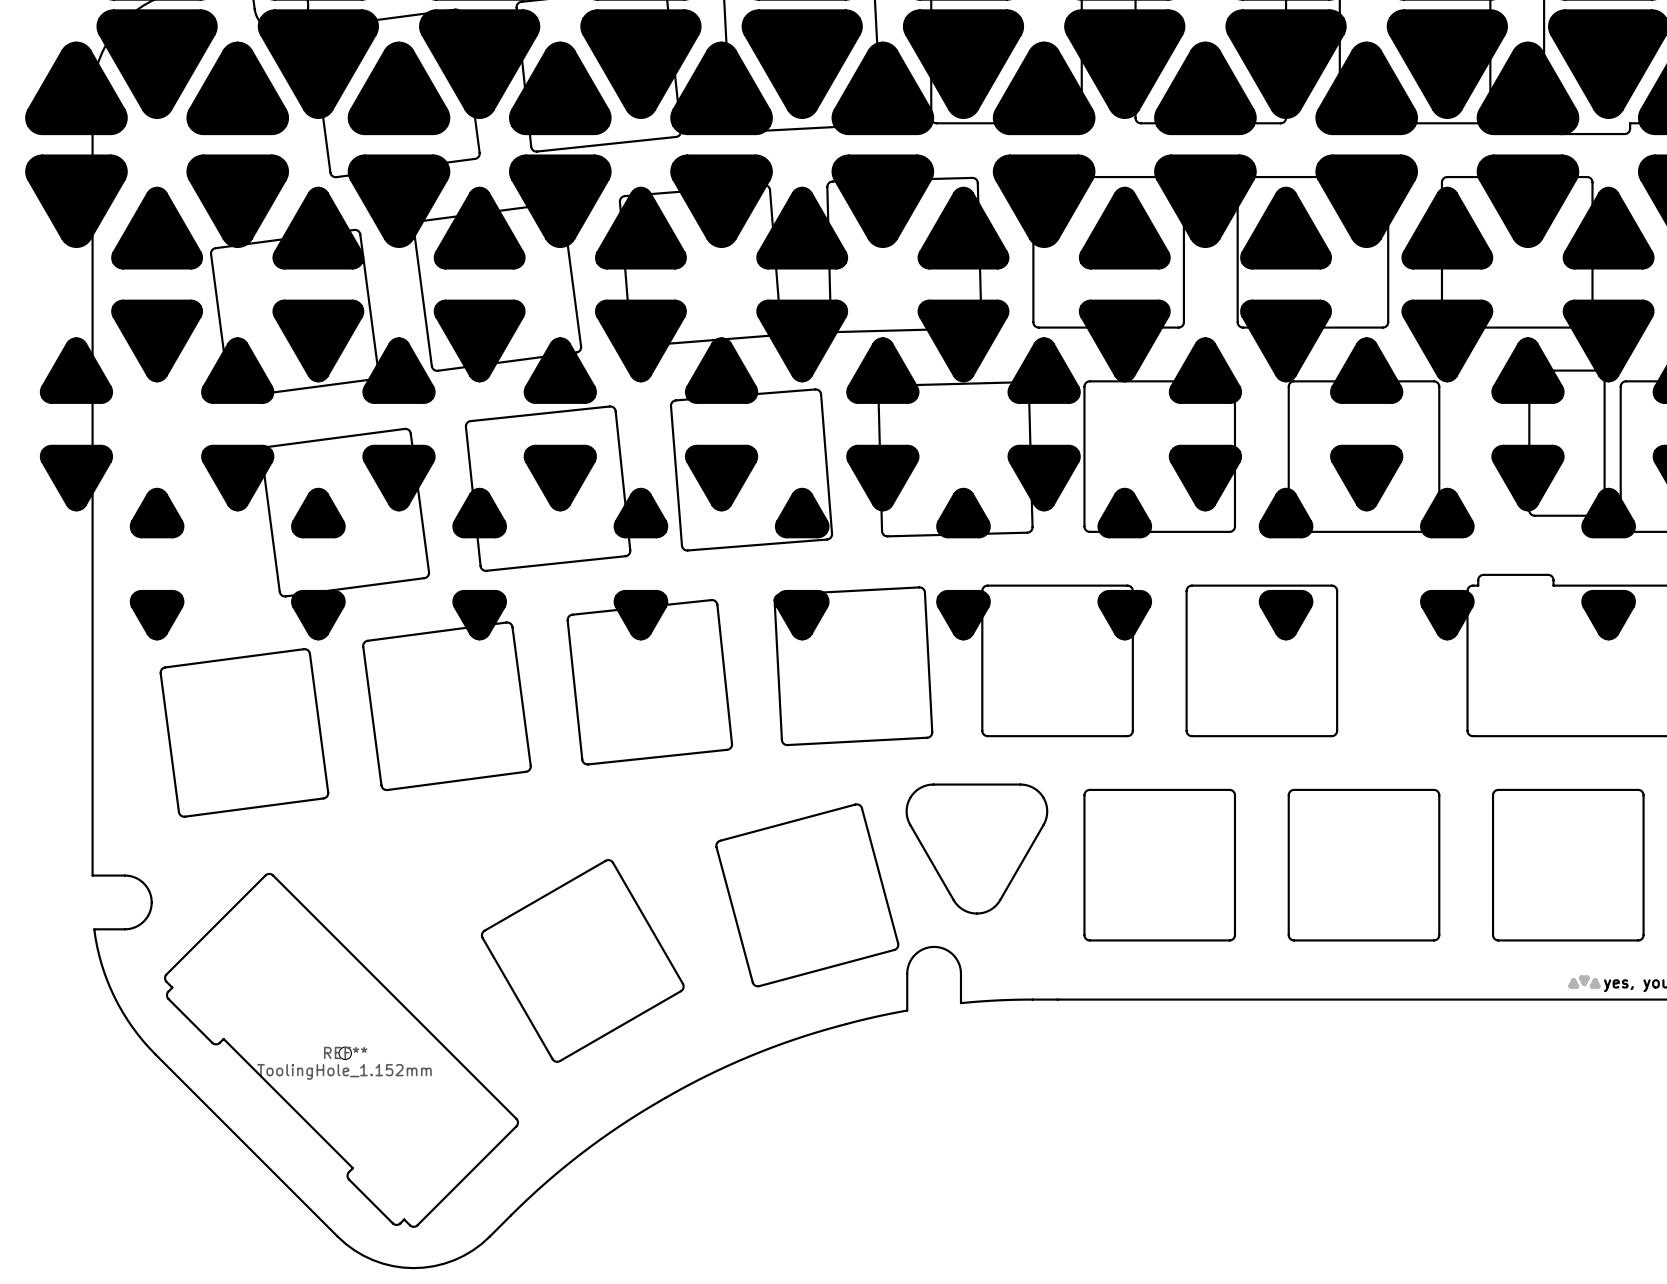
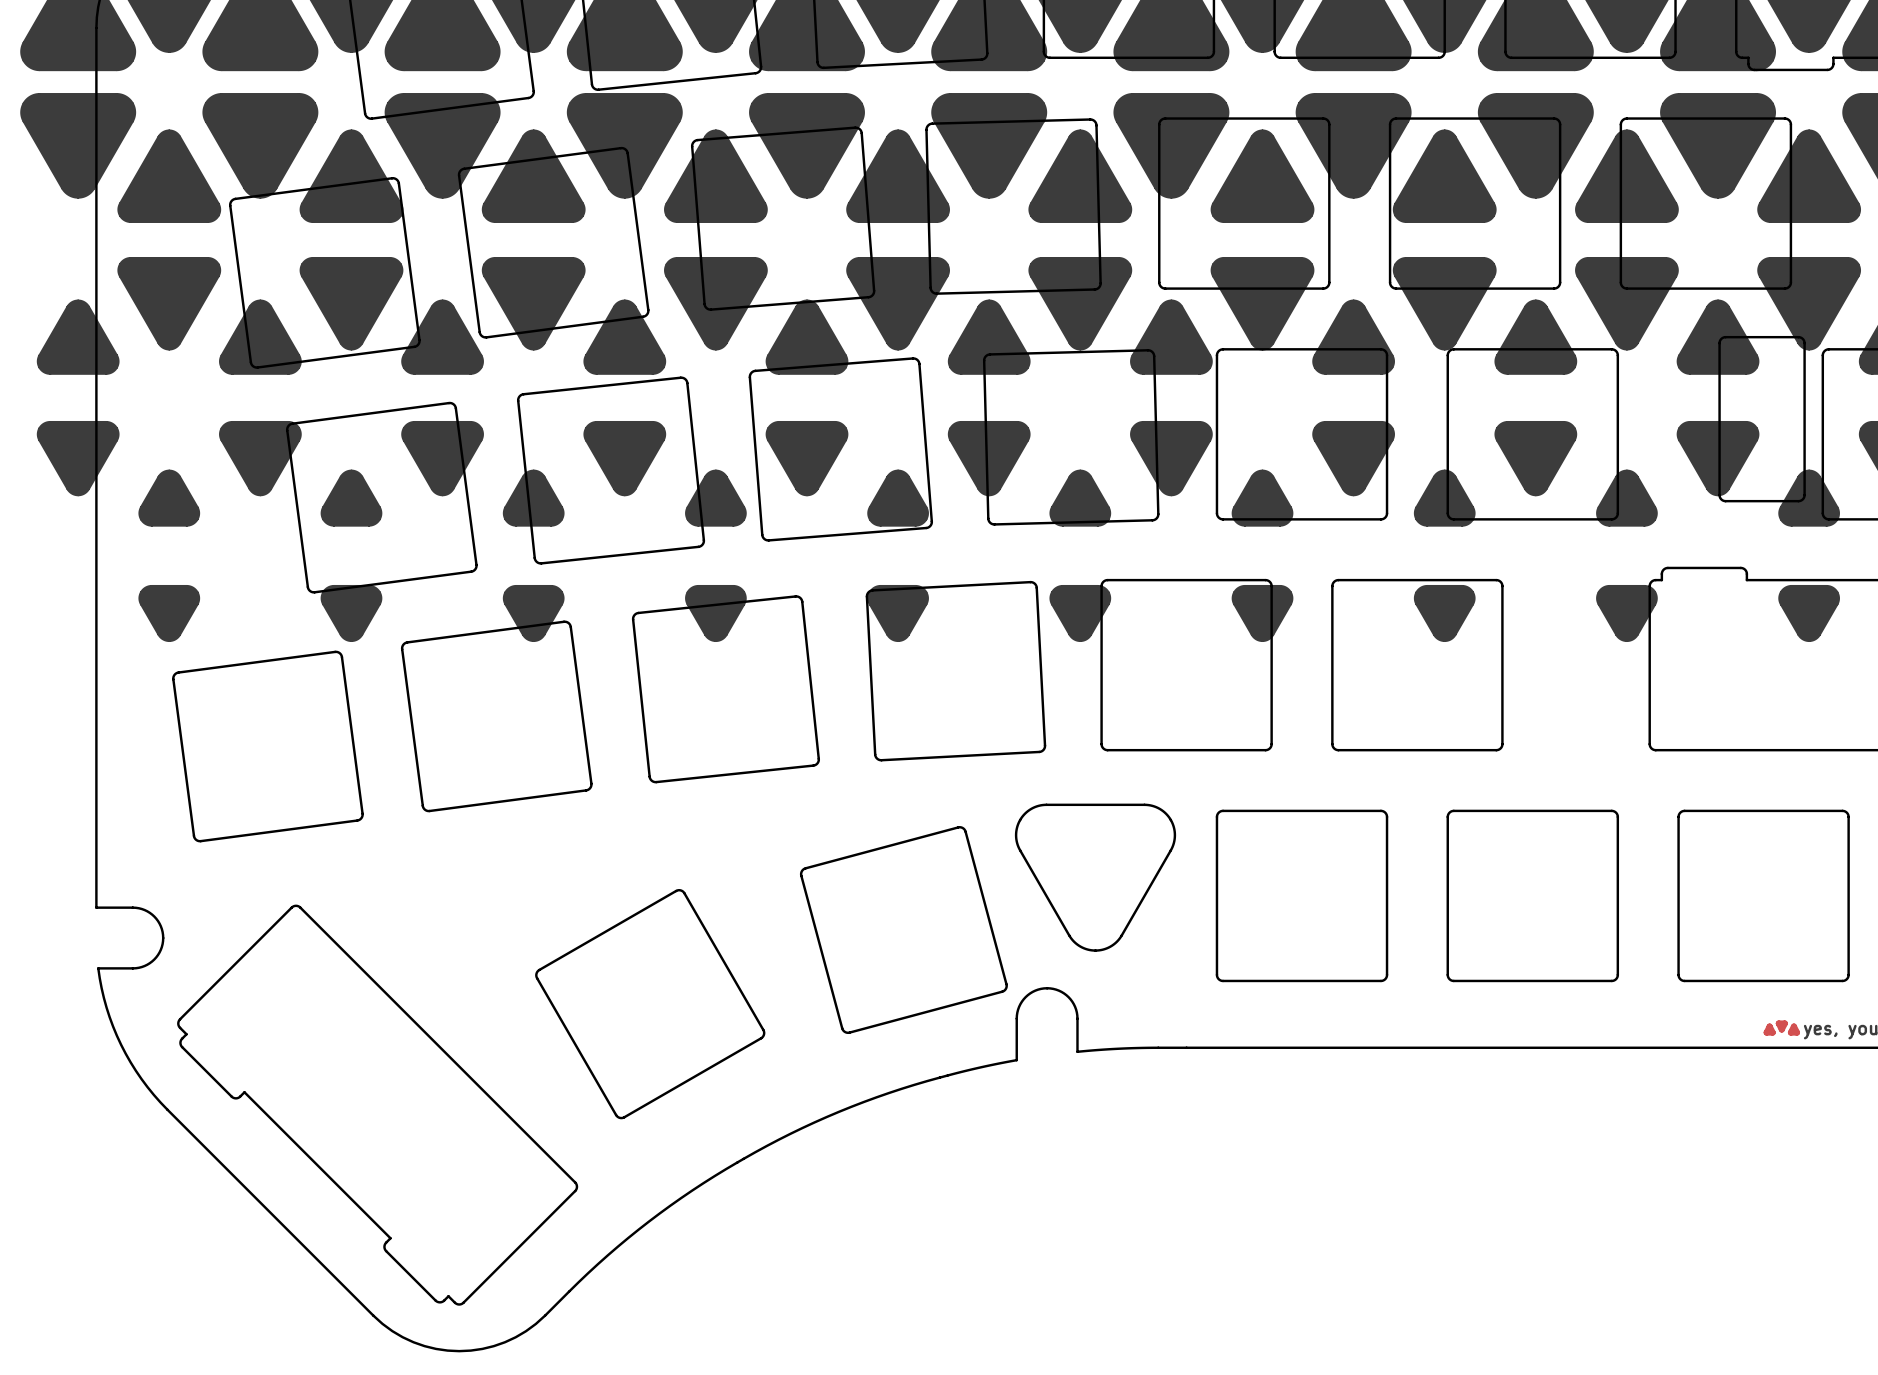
REF**: ToolingHole_1.152mm (345, 1053) -> none

